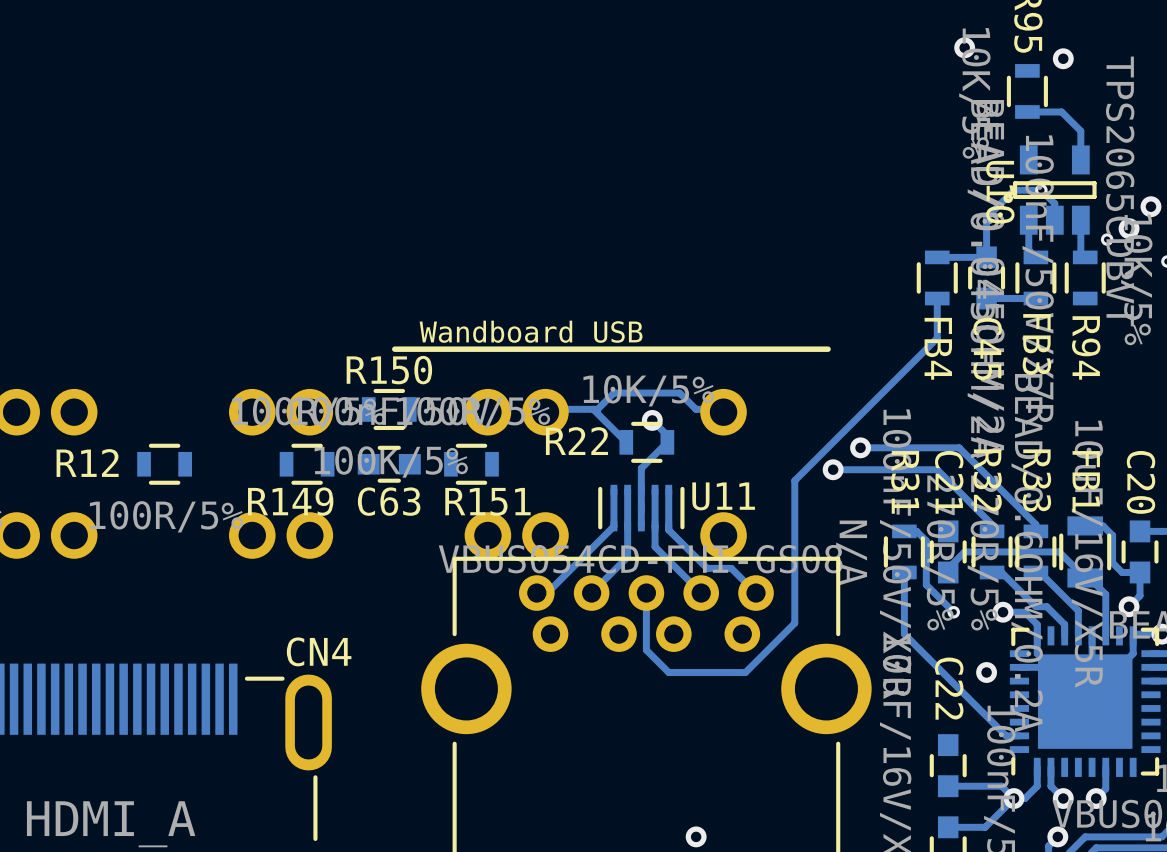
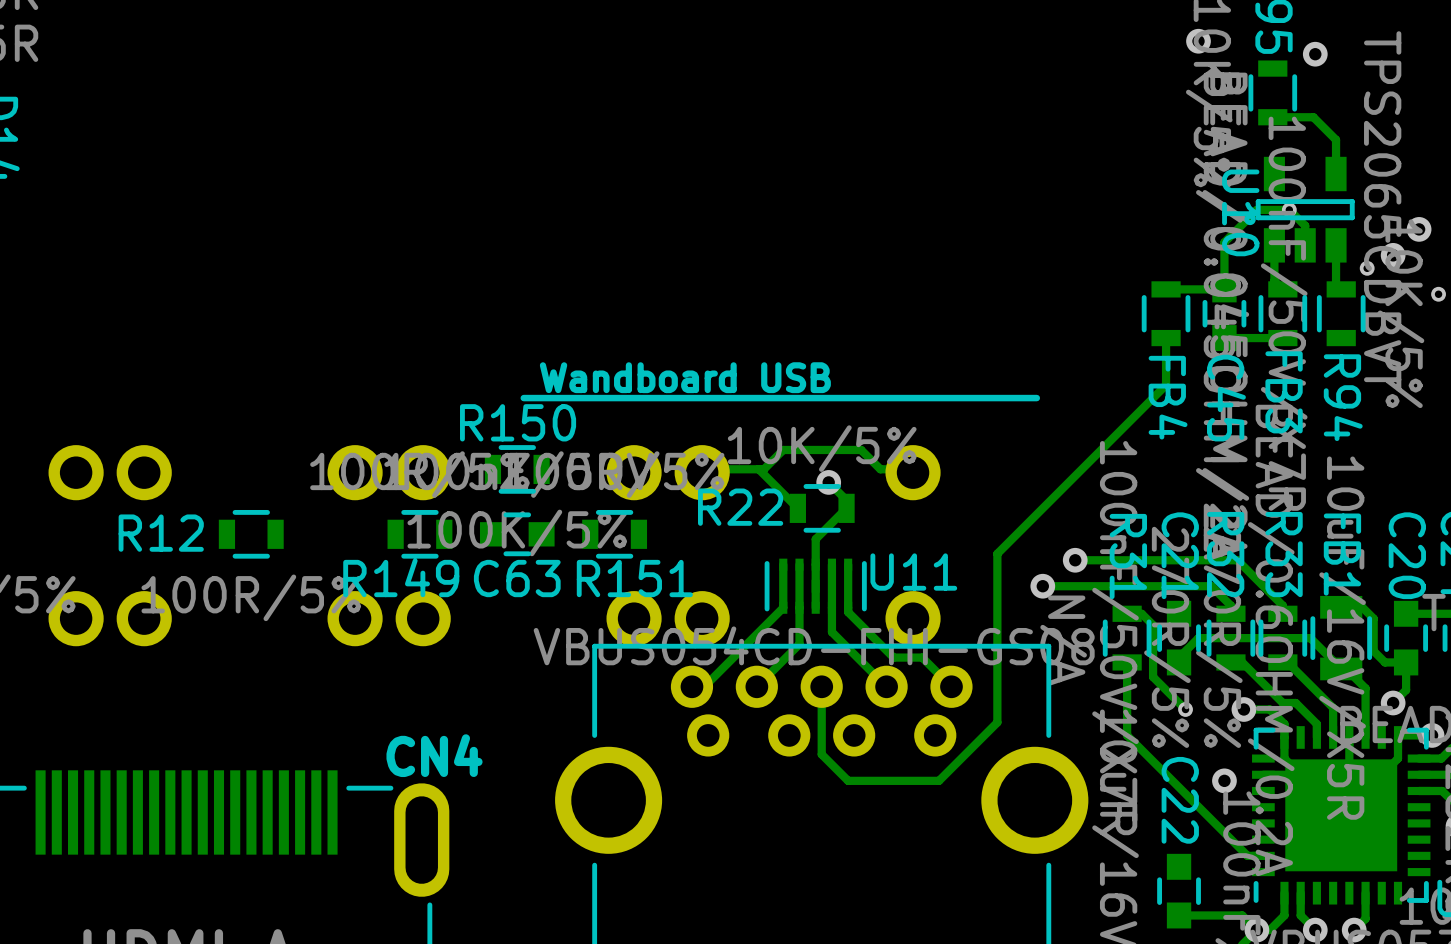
track: (860, 447) (959, 447) (997, 486) -> (1075, 560) (1237, 560)
via: (860, 447) -> none
track: (833, 469) (937, 469) (975, 508) -> (1042, 586) (1211, 586)
via: (833, 469) -> none
via: none -> (1075, 560)
via: none -> (1042, 586)

